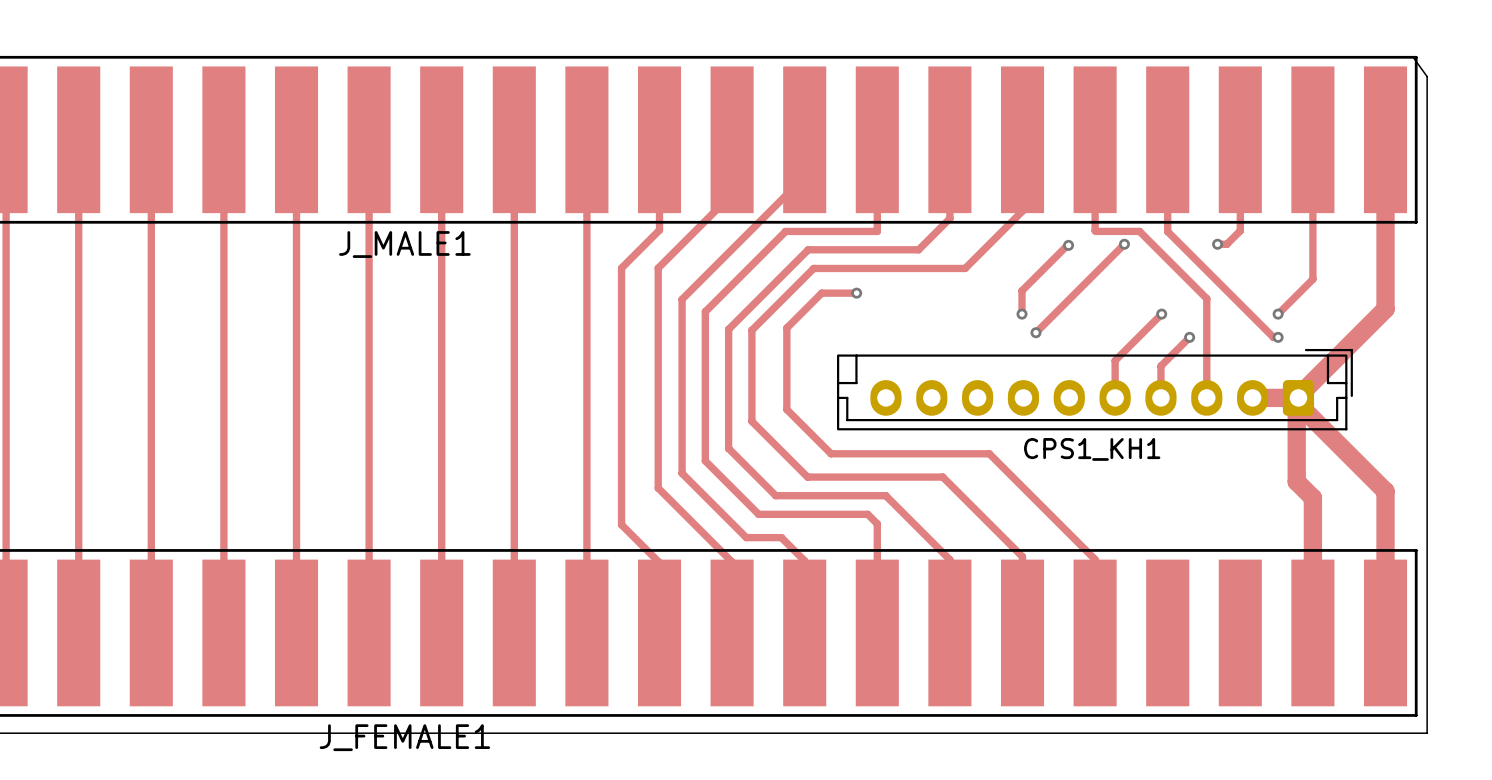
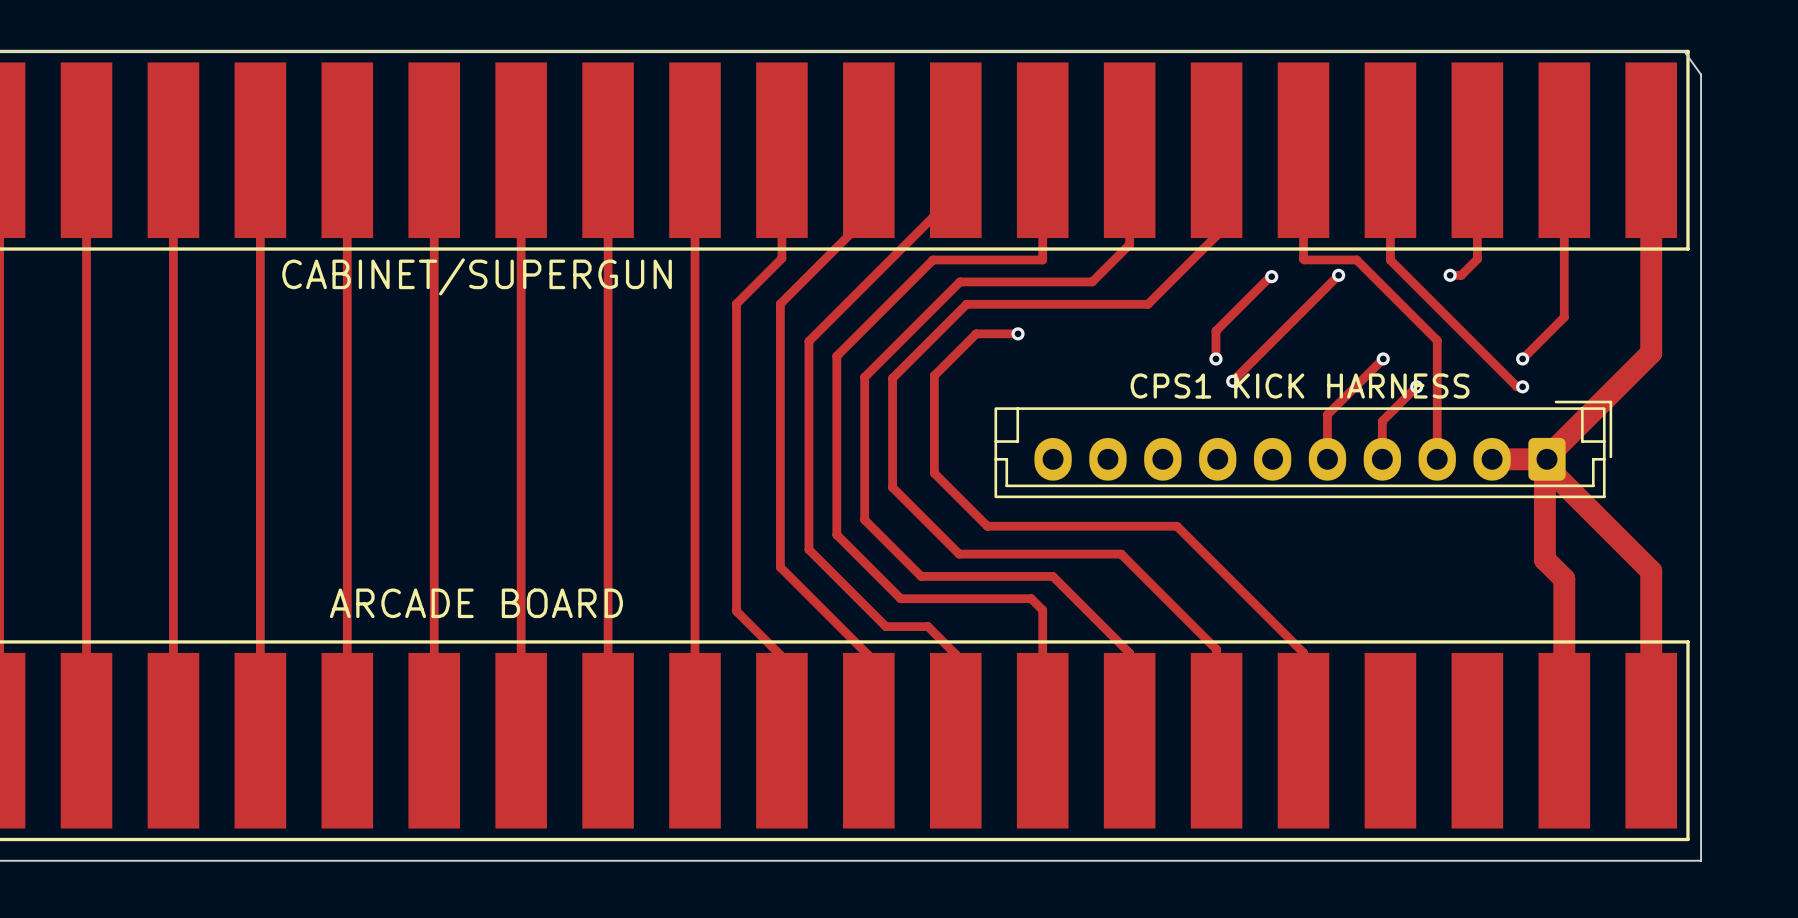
J_MALE1 name: J_MALE1 (404, 244) -> CABINET/SUPERGUN (477, 276)
CPS1_KH1 name: CPS1_KH1 (1092, 449) -> CPS1 KICK HARNESS (1300, 386)
J_FEMALE1 name: J_FEMALE1 (404, 737) -> ARCADE BOARD (476, 603)

